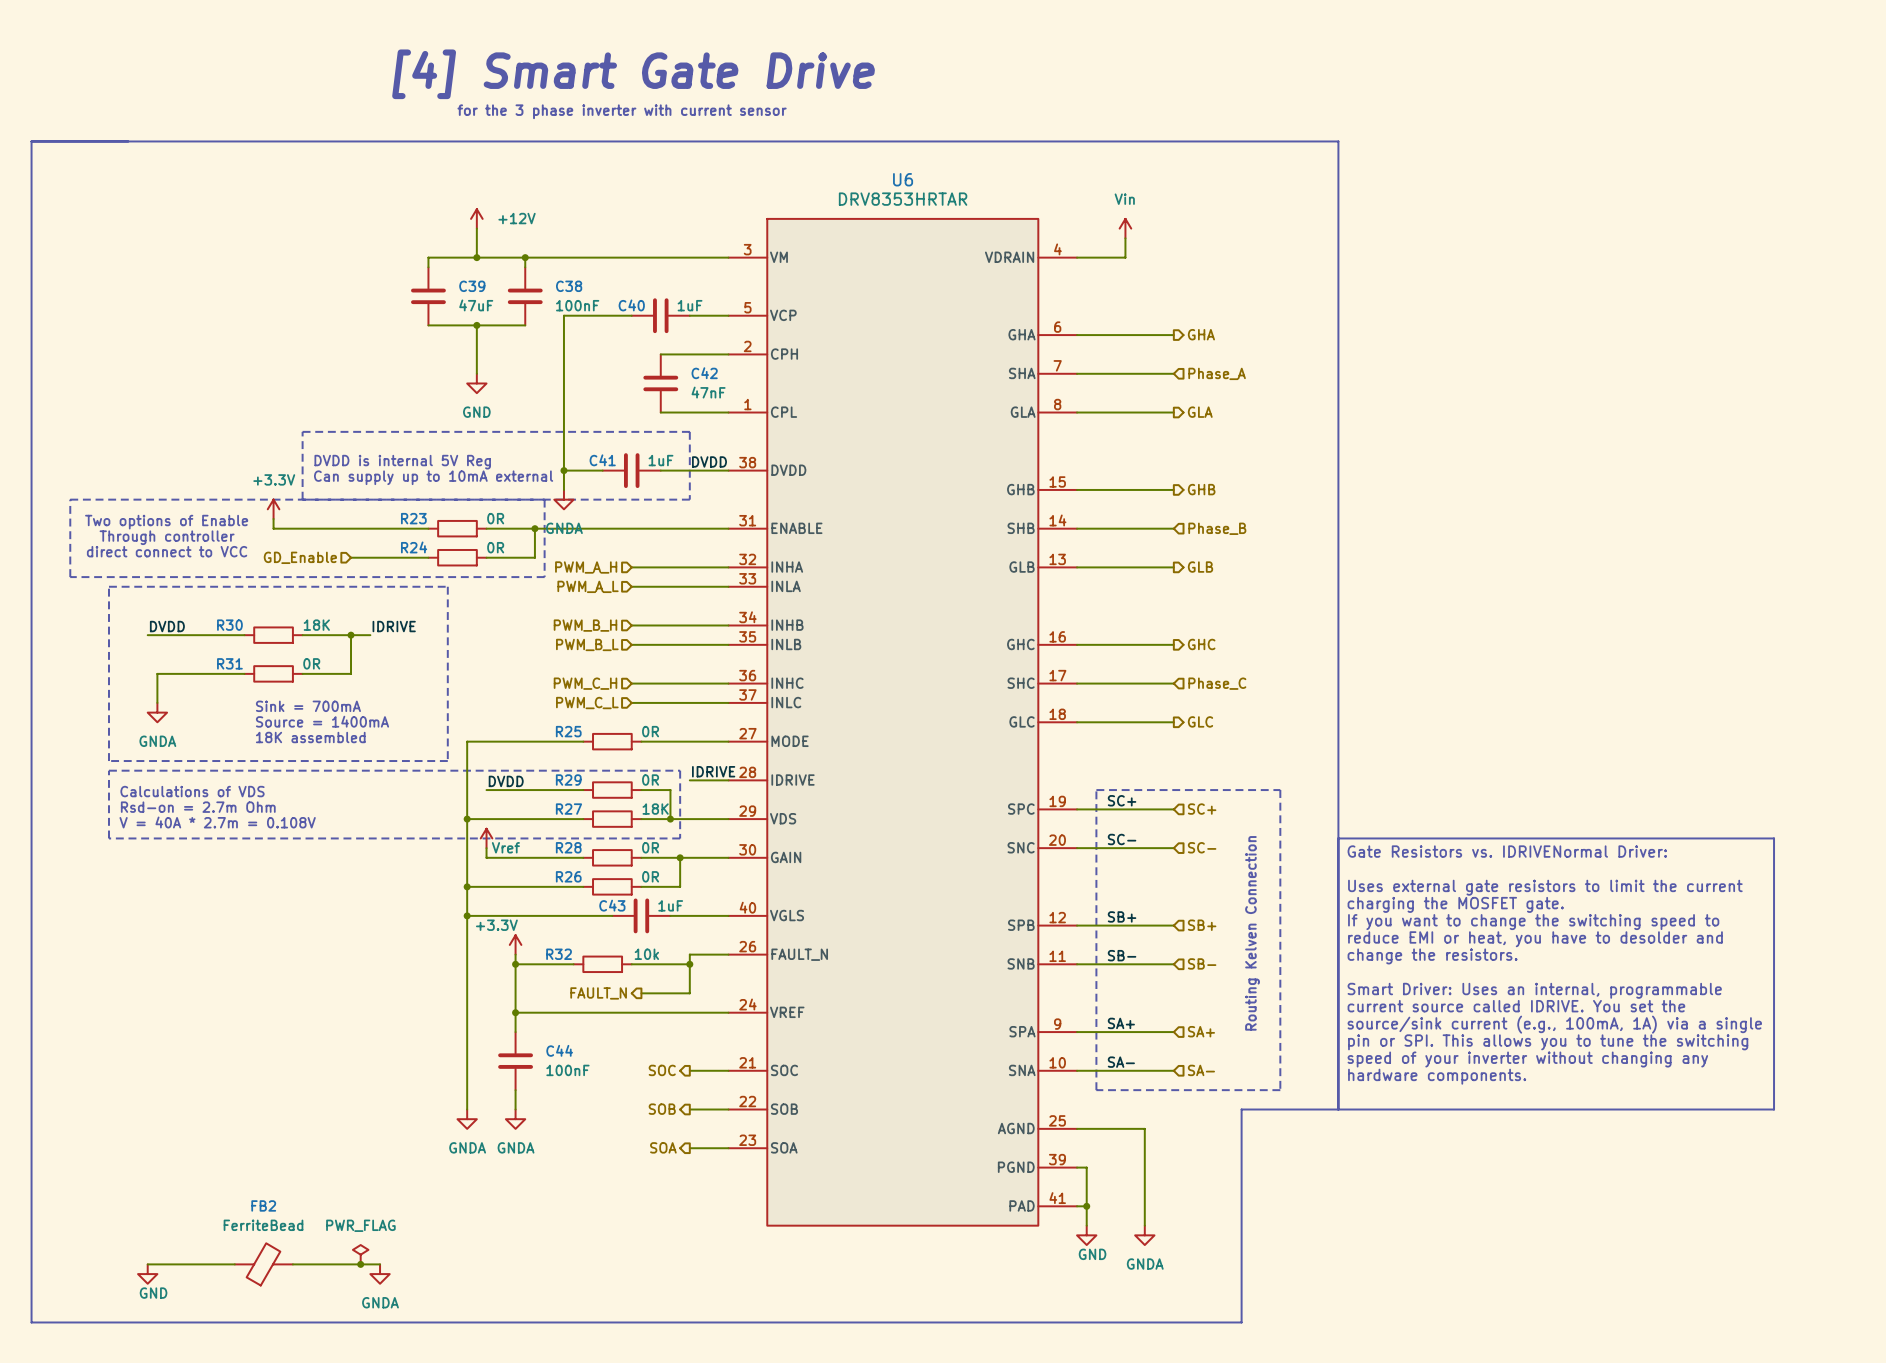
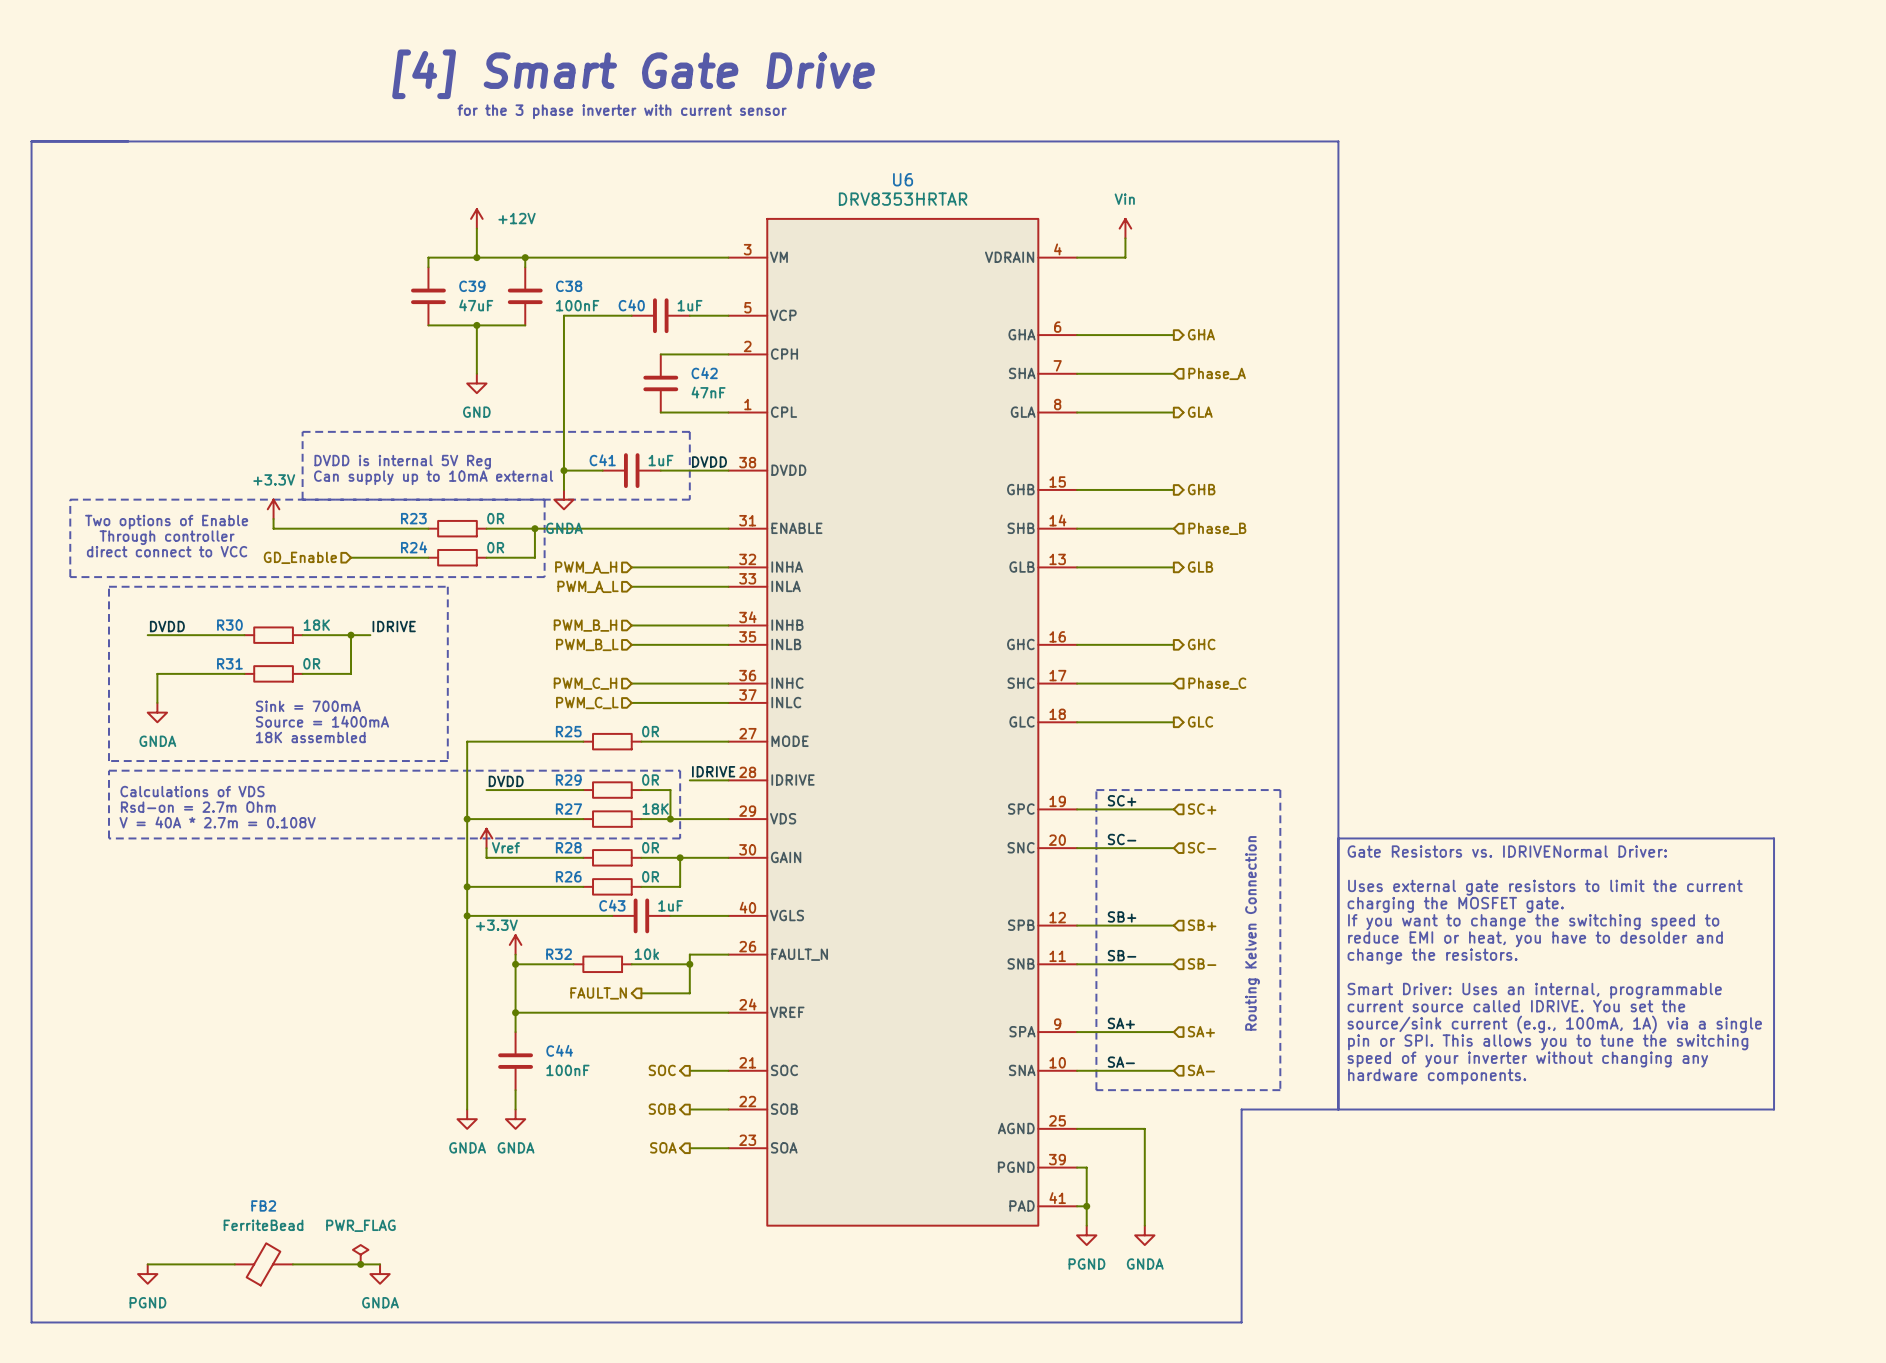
power symbol: GND (1086, 1235) -> PGND (1086, 1235)
power symbol: GND (147, 1274) -> PGND (147, 1274)

